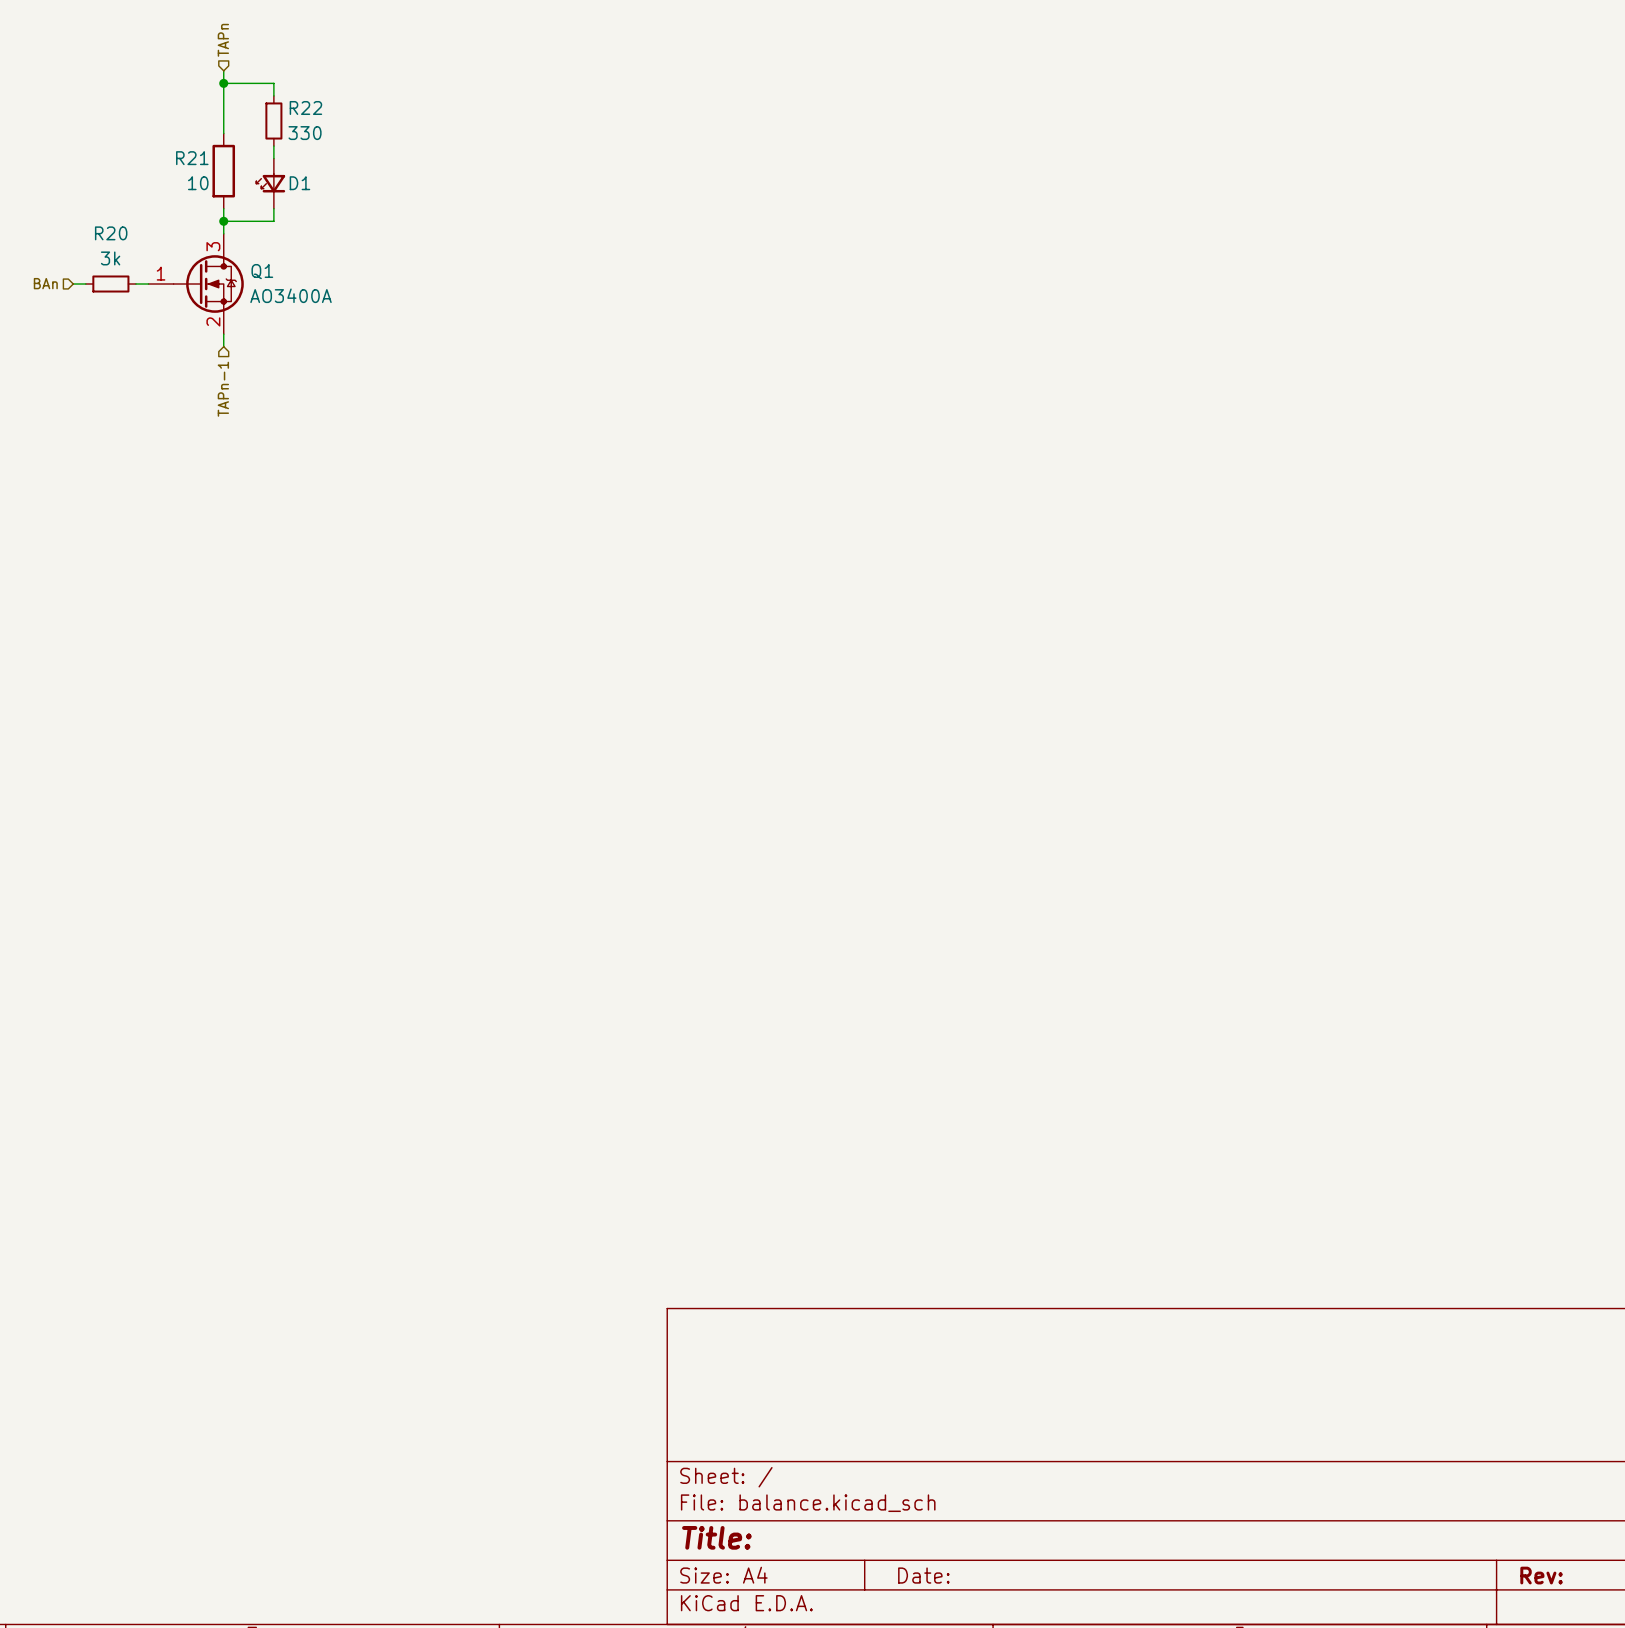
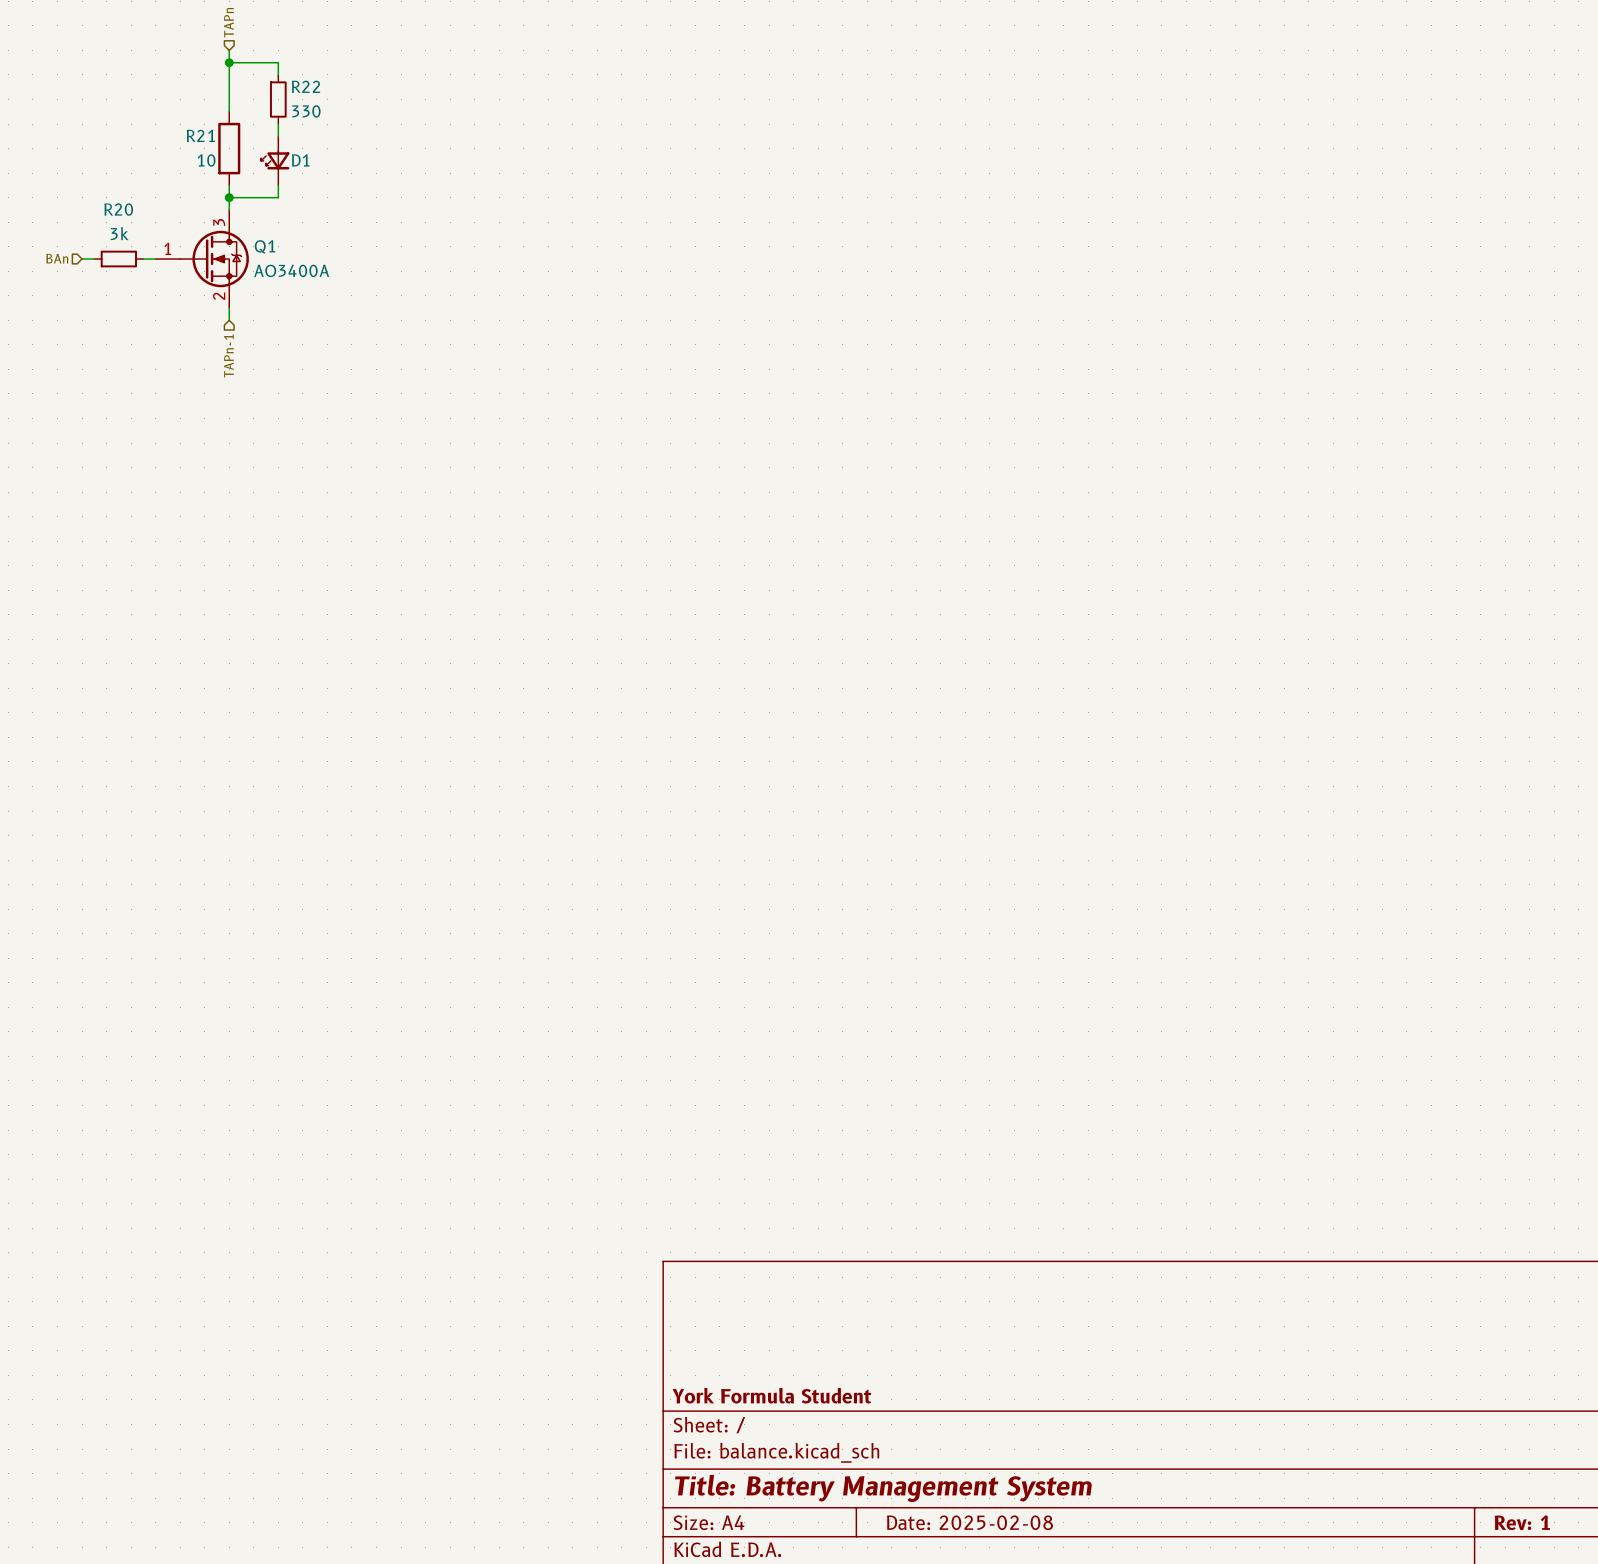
title block: none -> York Formula Student (771, 1395)
title block: Title: (716, 1537) -> Title: Battery Management System (883, 1488)
title block: Date: (923, 1575) -> Date: 2025-02-08 (969, 1522)
title block: Rev: (1541, 1575) -> Rev: 1 (1522, 1522)

